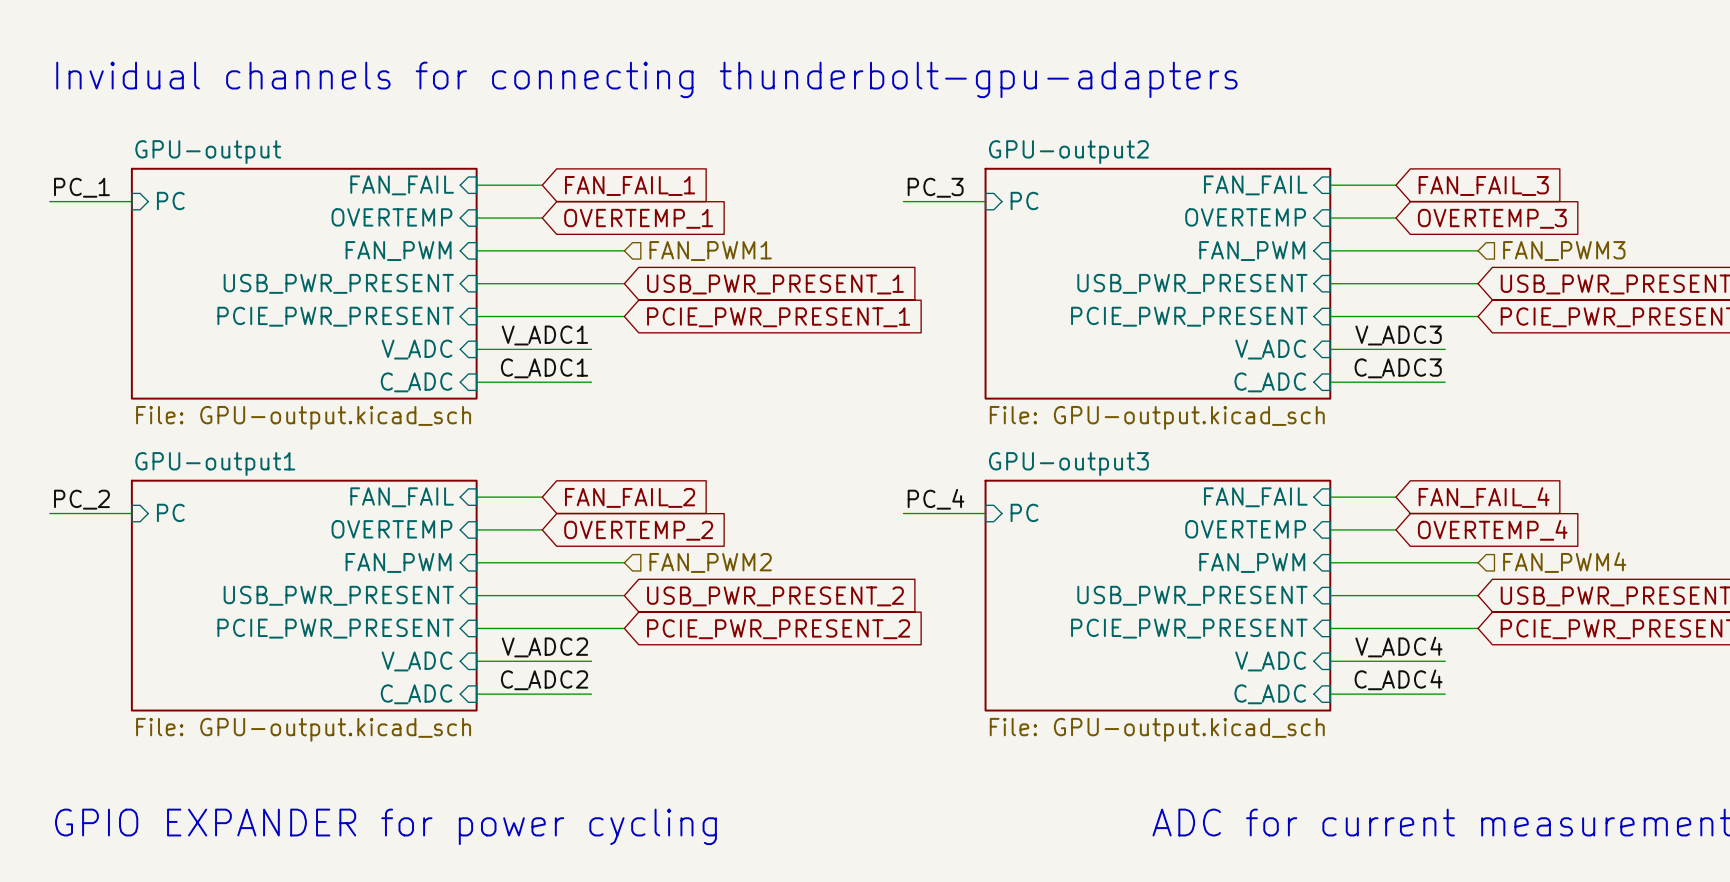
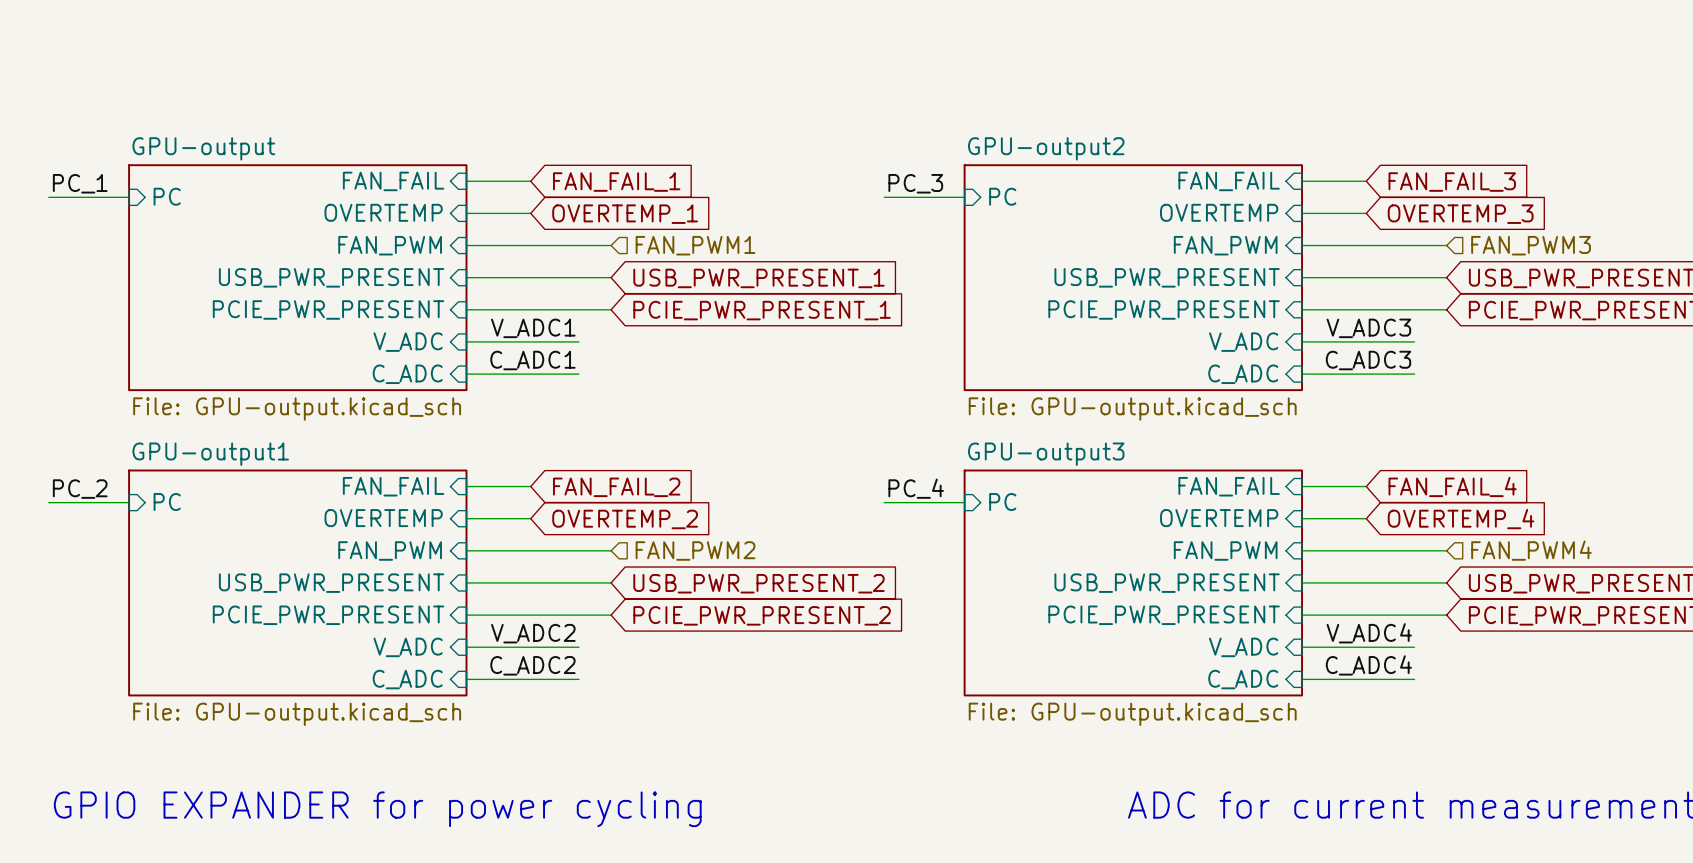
text: Invidual channels for connecting thunderbolt-gpu-adapters (646, 79) -> none

